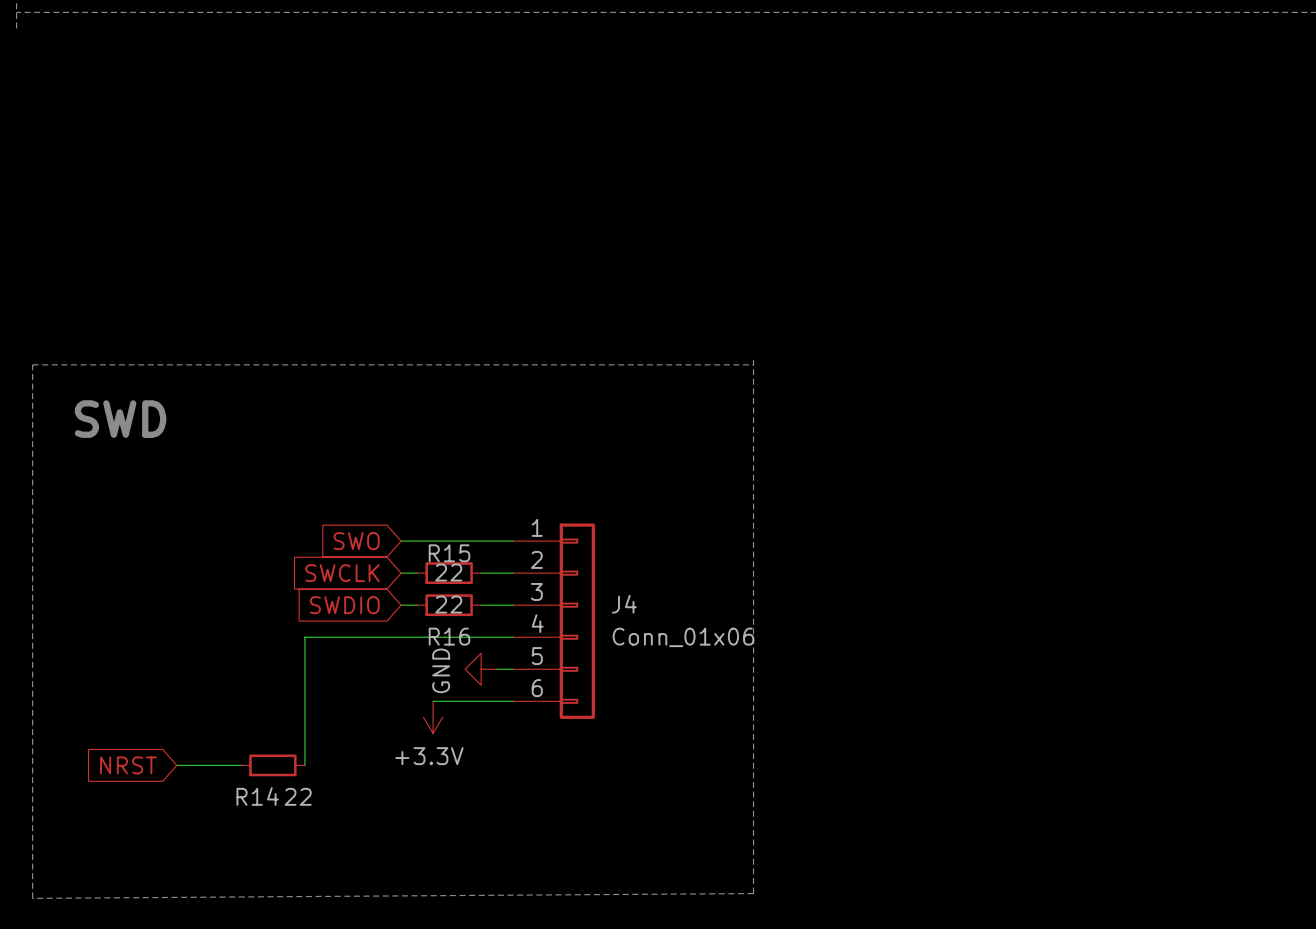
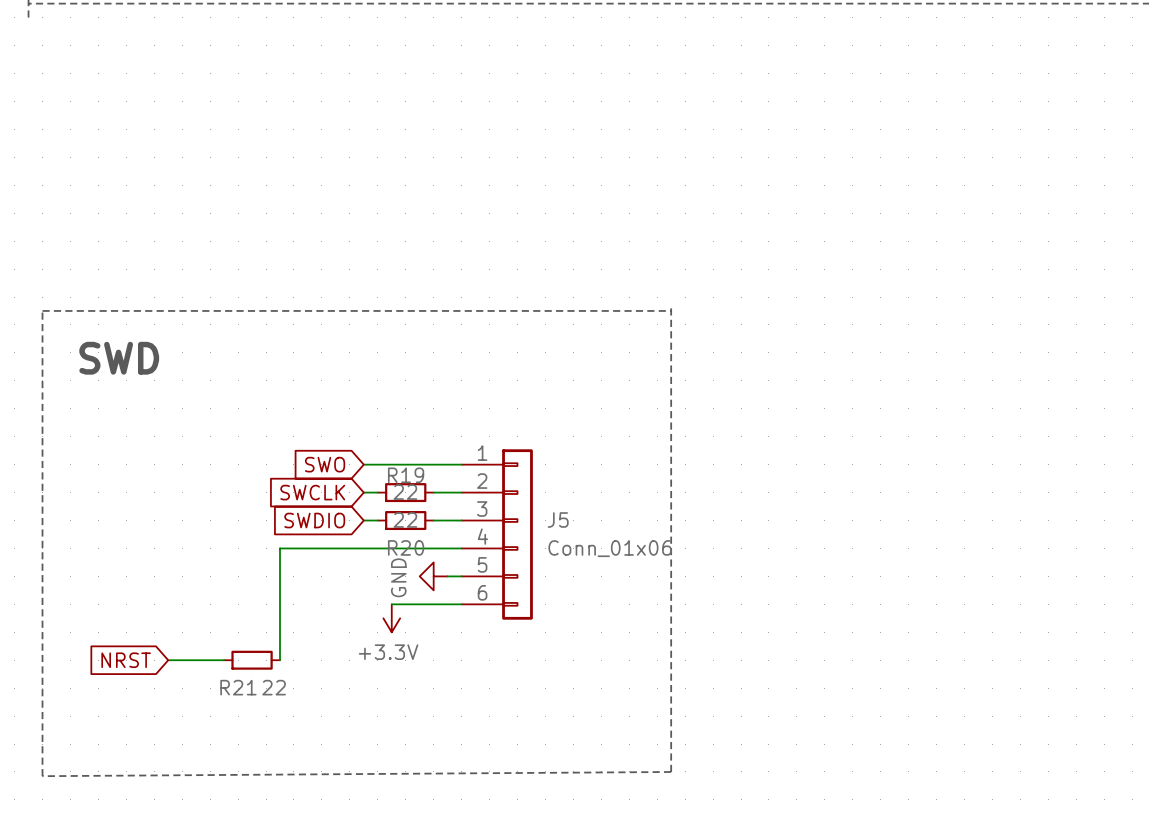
R15 name: R15 (449, 553) -> R19 (406, 475)
J4 name: J4 (624, 604) -> J5 (558, 520)
R16 name: R16 (449, 636) -> R20 (406, 547)
R14 name: R14 (257, 796) -> R21 (238, 687)

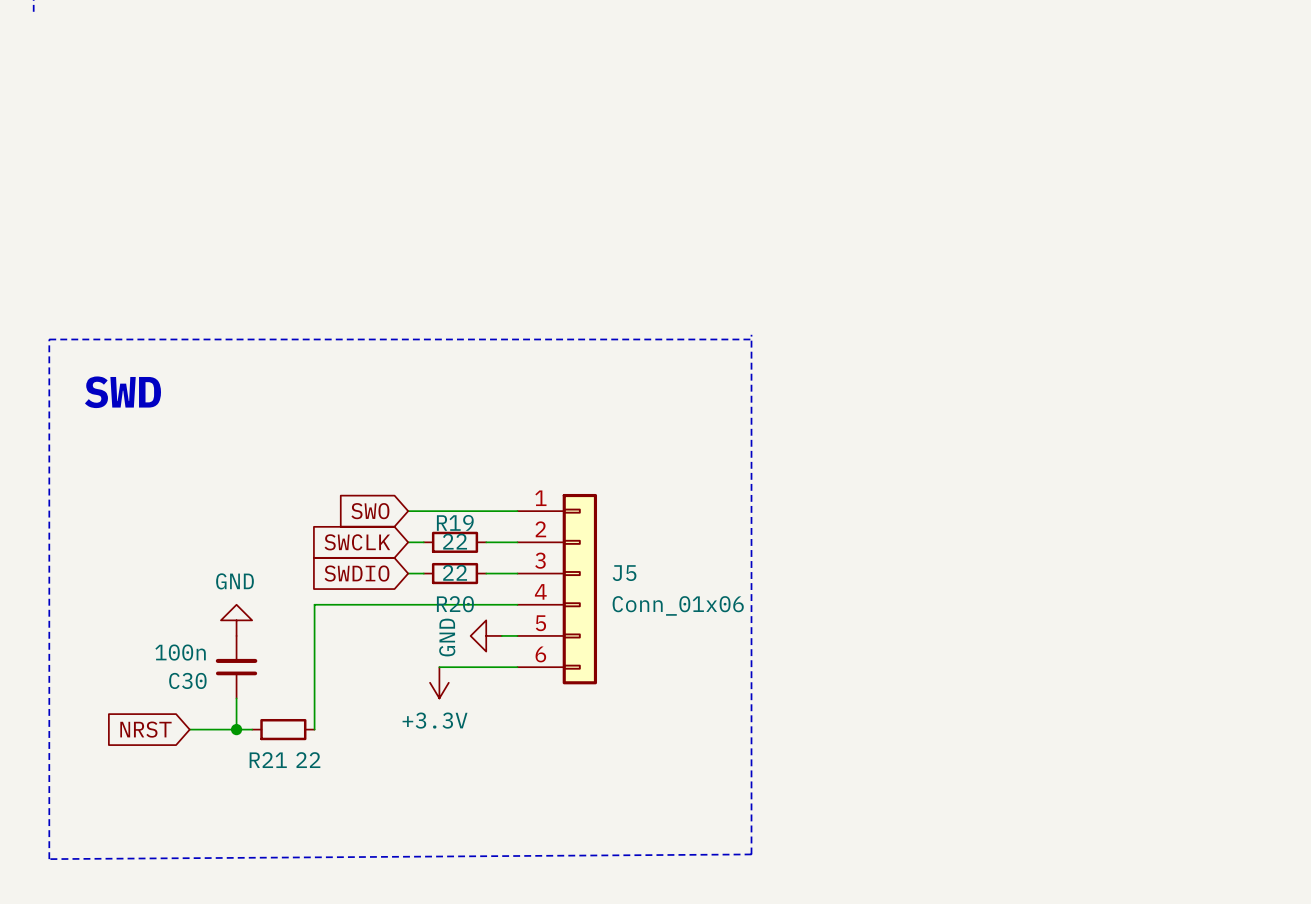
power symbol: none -> GND (236, 620)
C30: none -> 100n (236, 667)
wire: none -> (236, 698) (236, 729)
junction: none -> (236, 729)

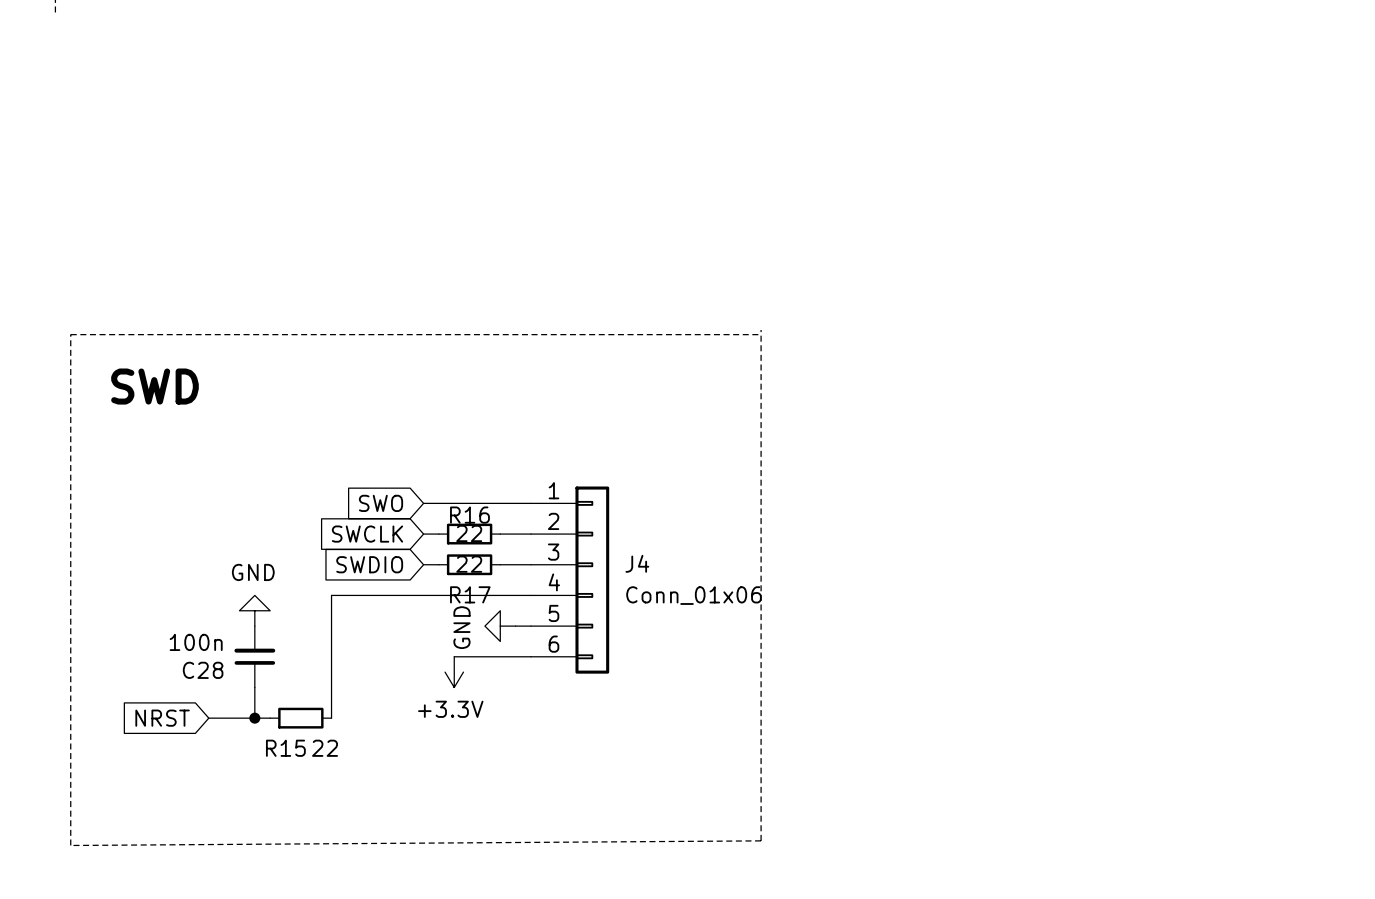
R19 name: R19 (455, 522) -> R16 (469, 515)
J5 name: J5 (624, 573) -> J4 (637, 563)
R20 name: R20 (455, 604) -> R17 (470, 594)
C30 name: C30 (187, 680) -> C28 (203, 670)
R21 name: R21 (268, 760) -> R15 (285, 748)

